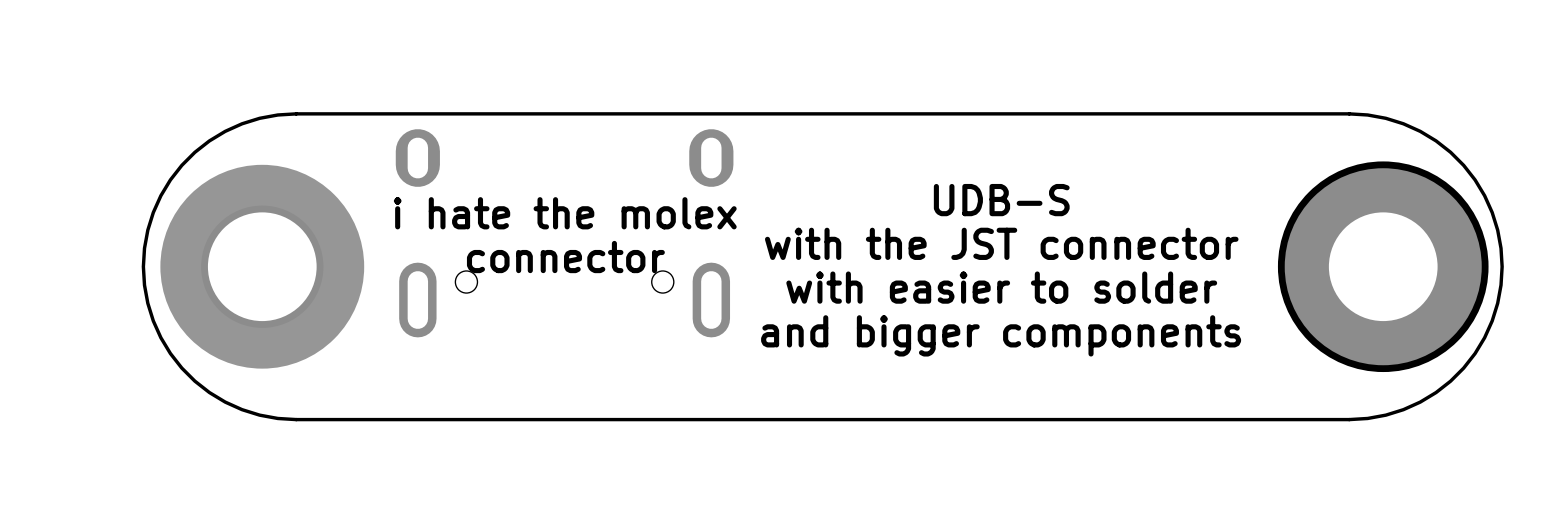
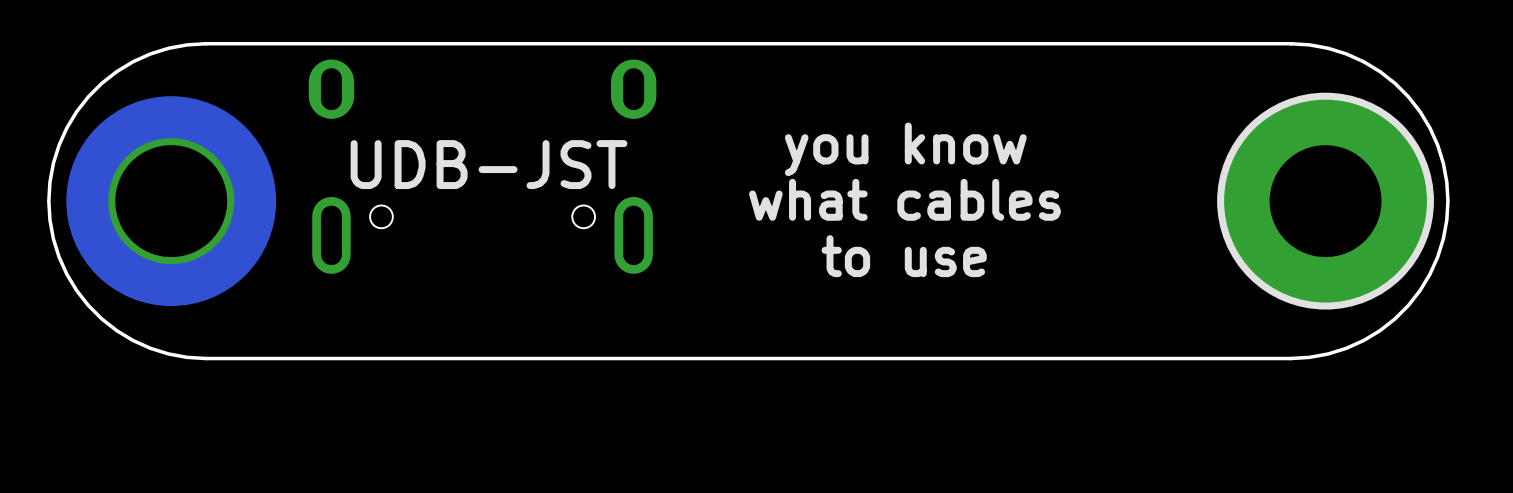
text: UDB-S (1001, 200) -> none
text: i hate the molex (565, 213) -> none
text: none -> you know (905, 149)
text: none -> UDB-JST (489, 164)
text: with the JST connector (1001, 243) -> none
text: connector (565, 257) -> none
text: none -> what cables (904, 199)
text: with easier to solder (1001, 287) -> none
text: none -> to use (904, 256)
text: and bigger components (1001, 335) -> none

